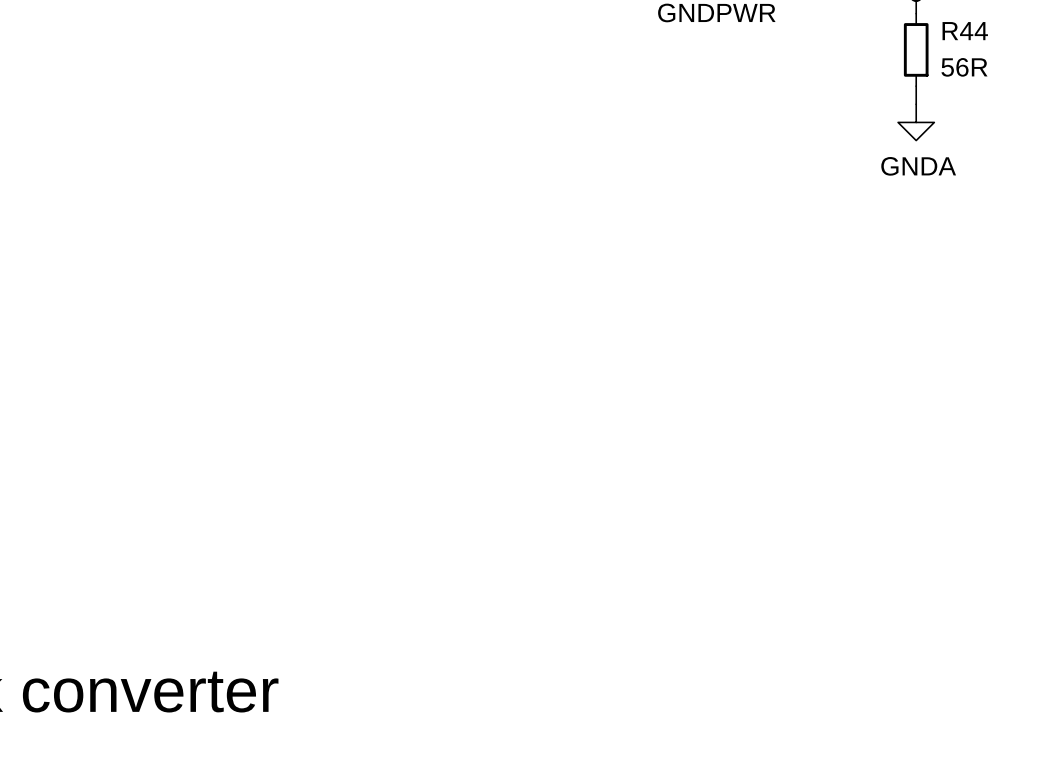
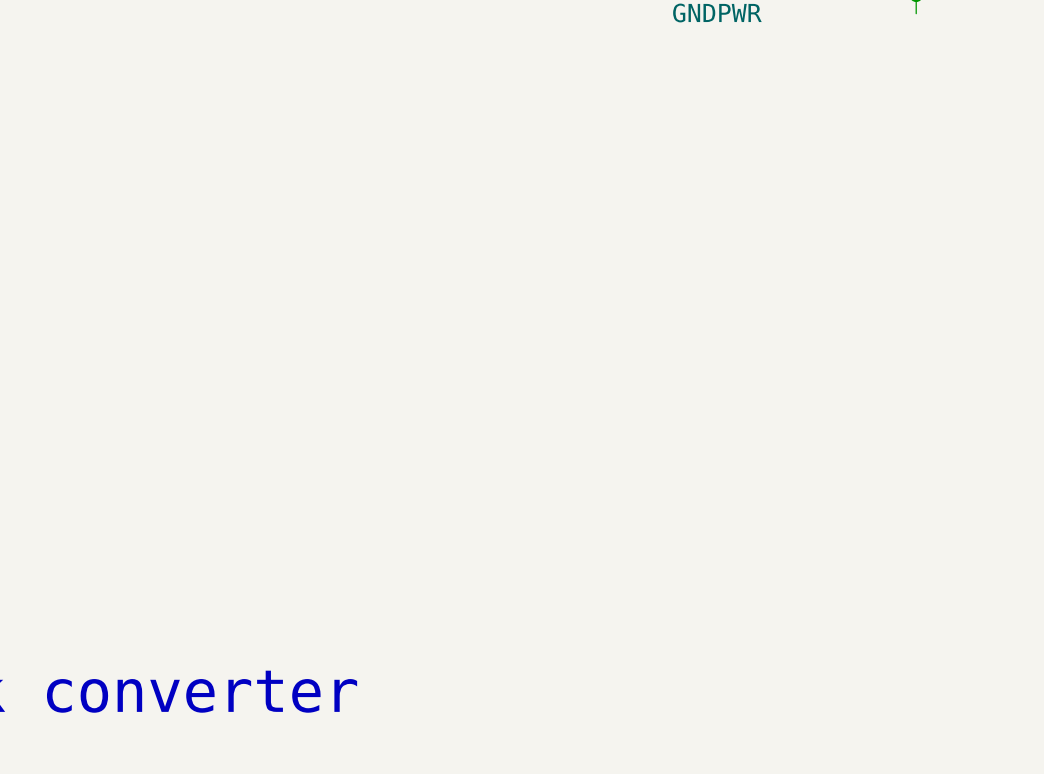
R44: 56R (916, 49) -> none
wire: (916, 86) (916, 104) -> none
power symbol: GNDA (916, 122) -> none

